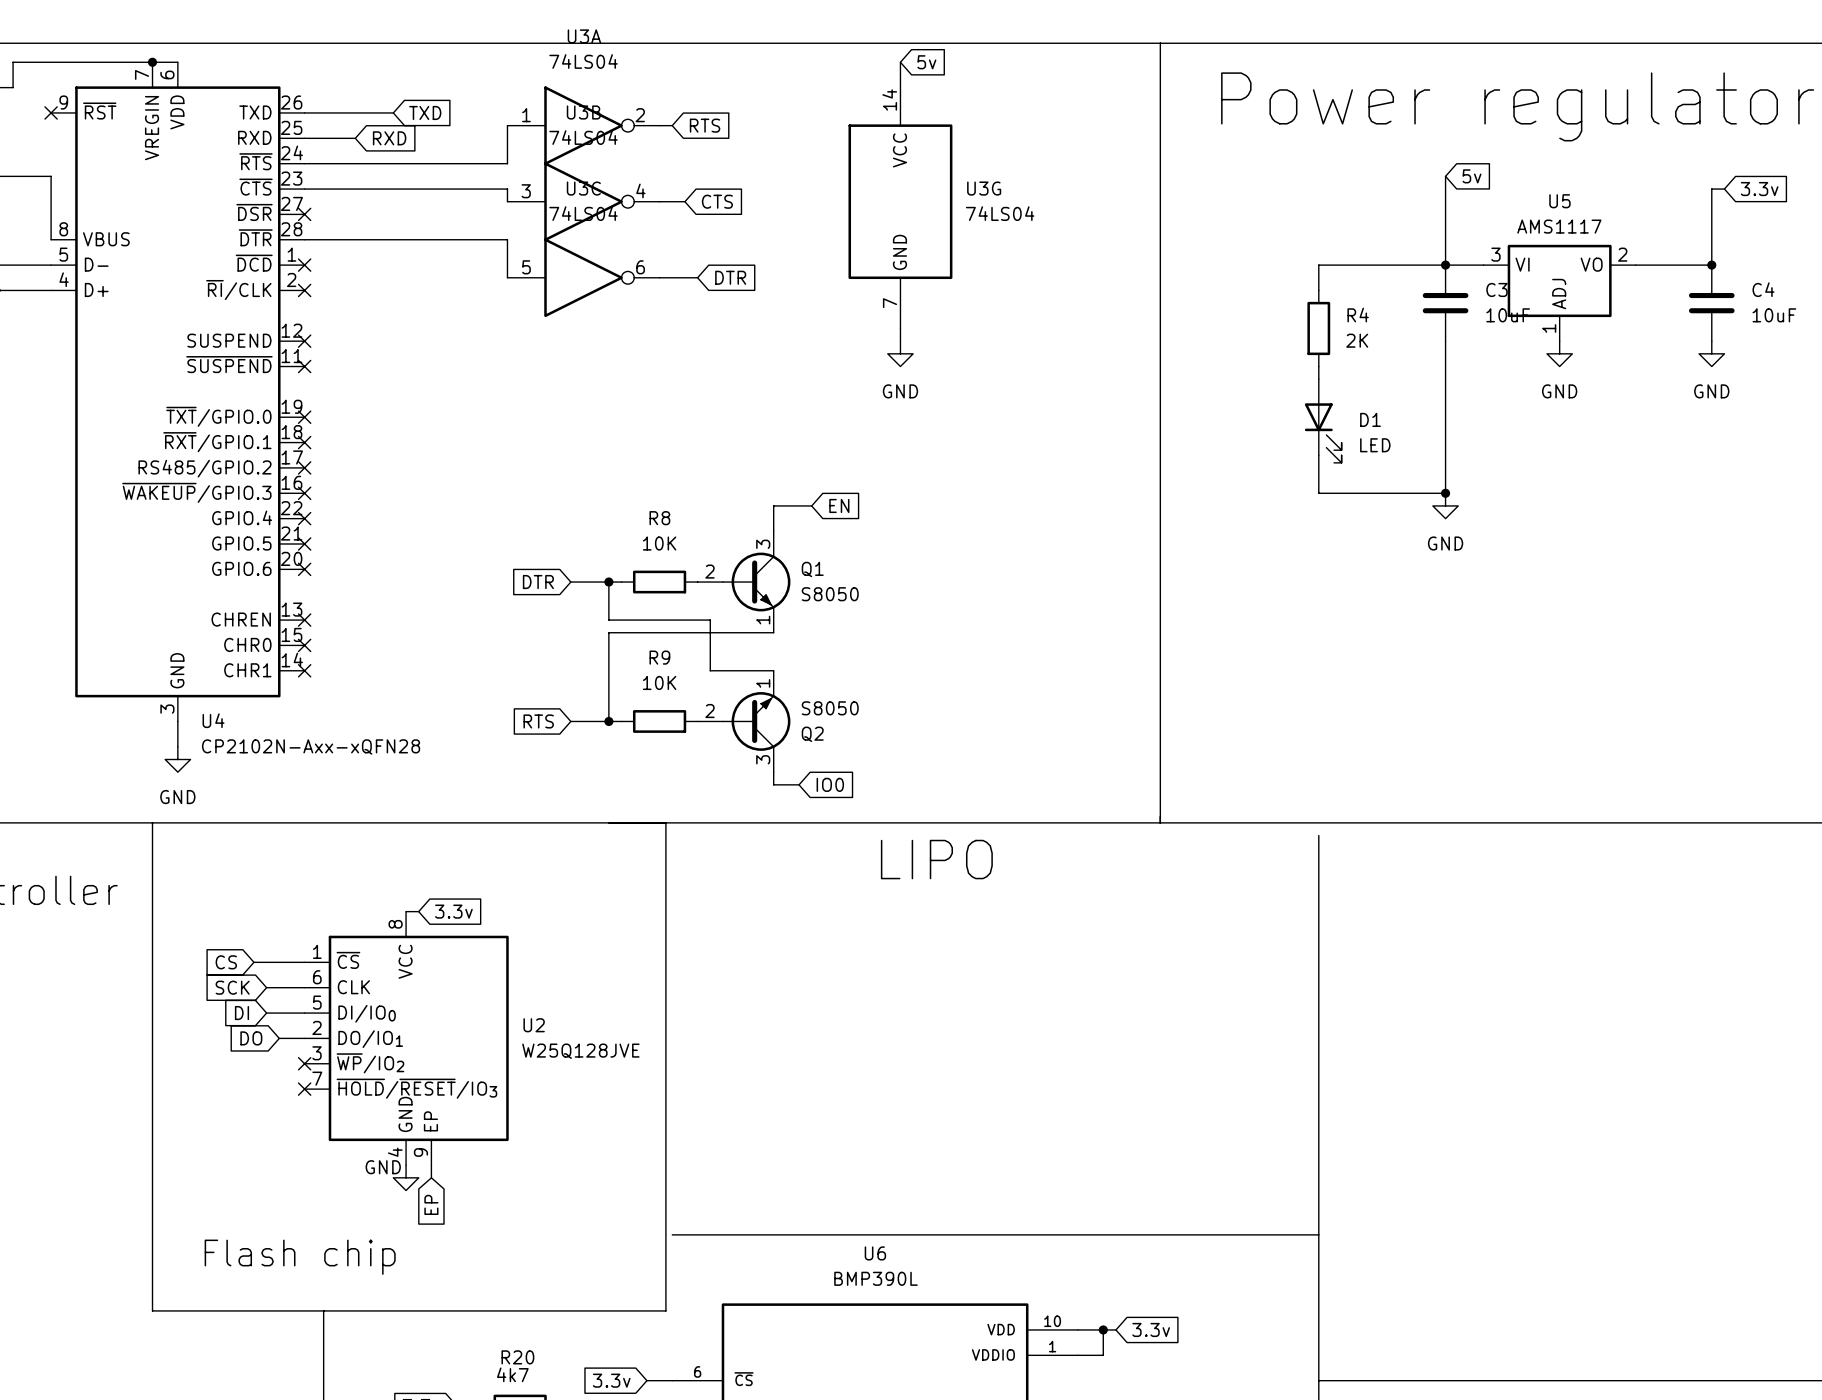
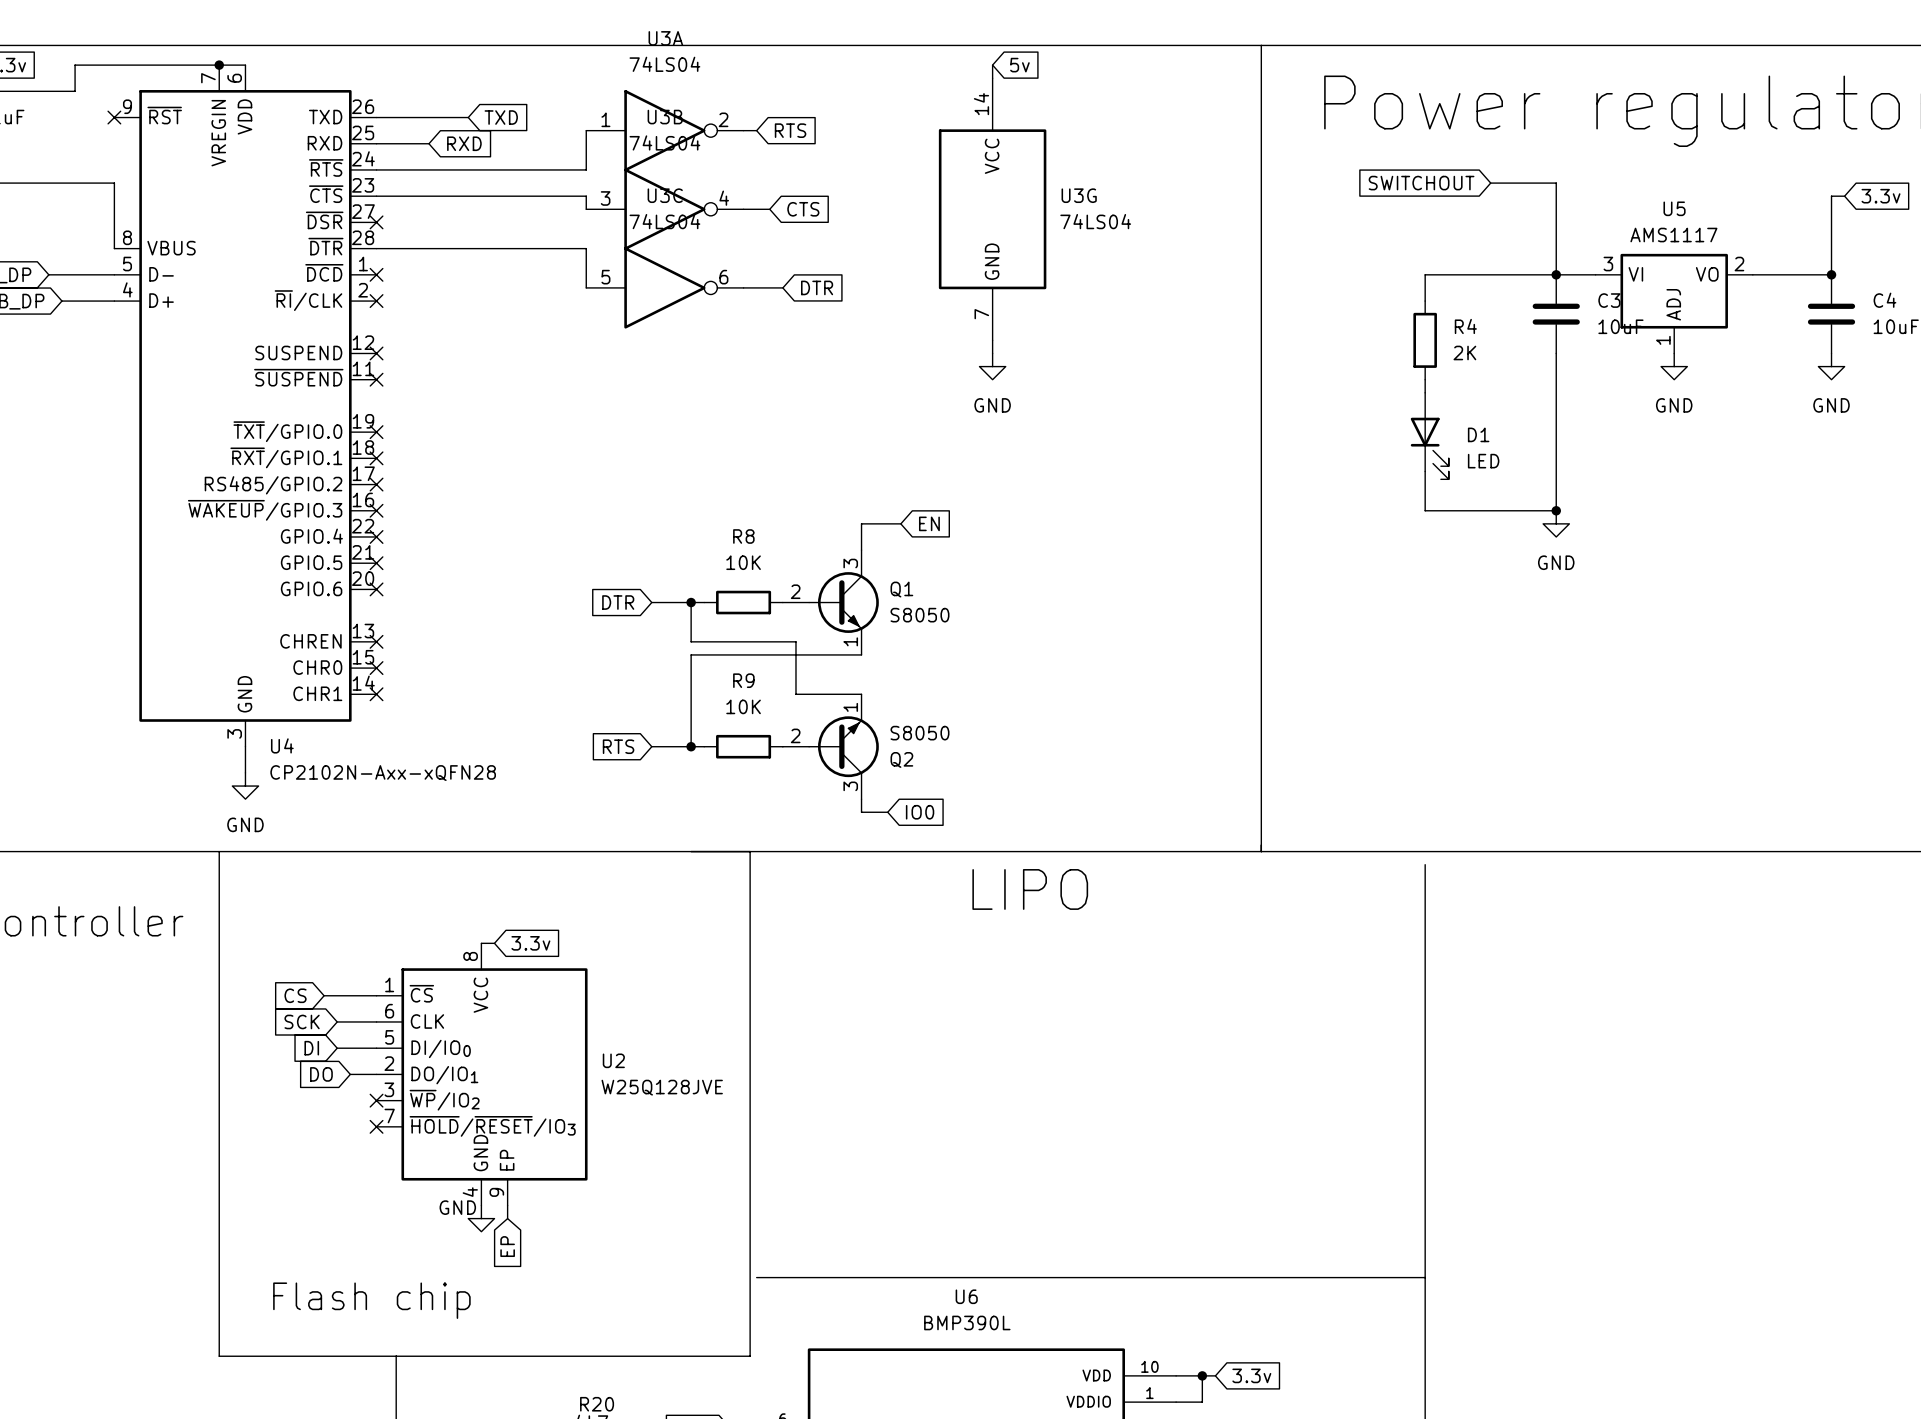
global label: none -> SWITCHOUT (1421, 183)
wire: none -> (1490, 183) (1556, 183)
global label: 5v (1472, 176) -> none

